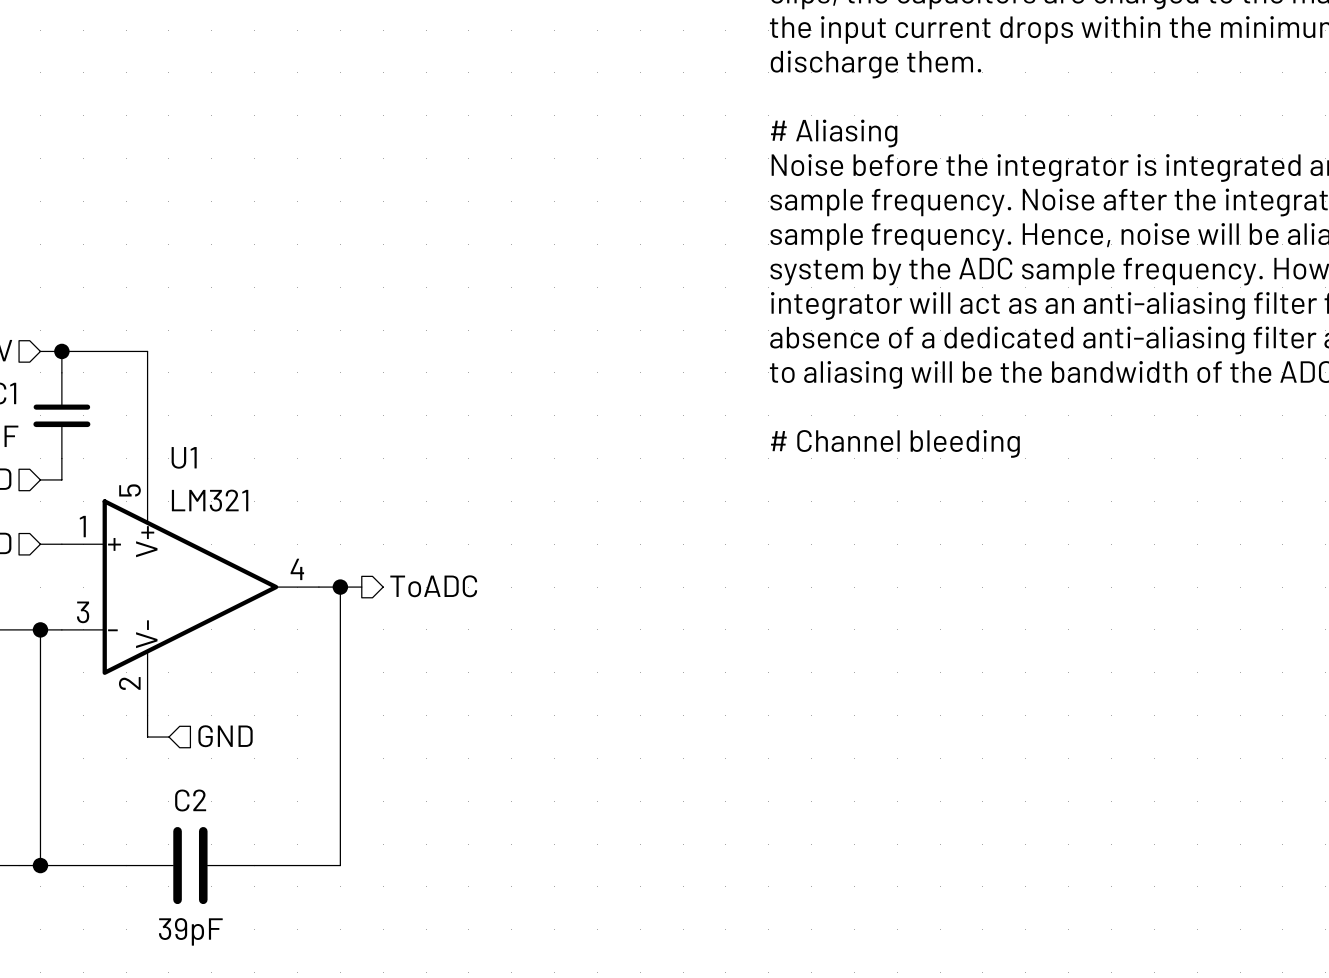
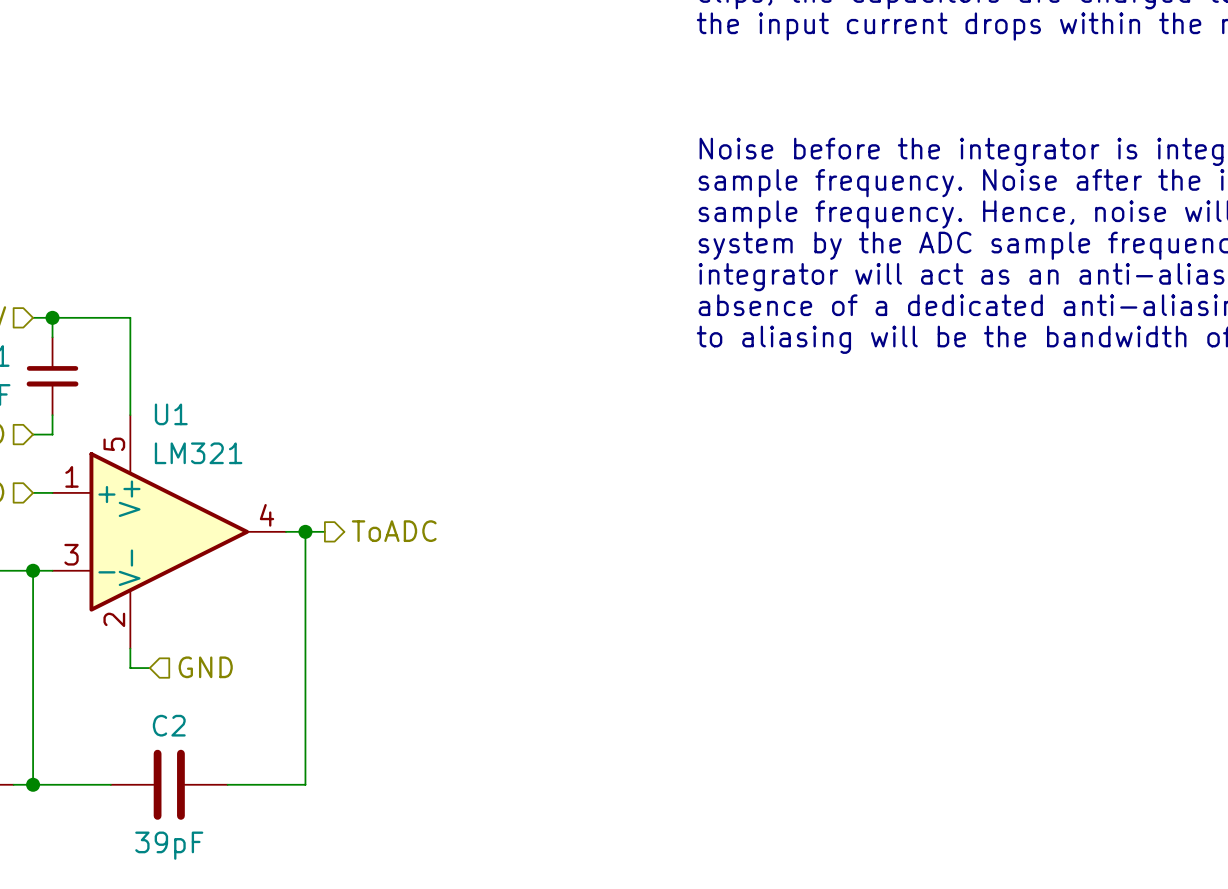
text: discharge them. (875, 64) -> none
text: # Aliasing (834, 133) -> none
text: # Channel bleeding (895, 443) -> none

